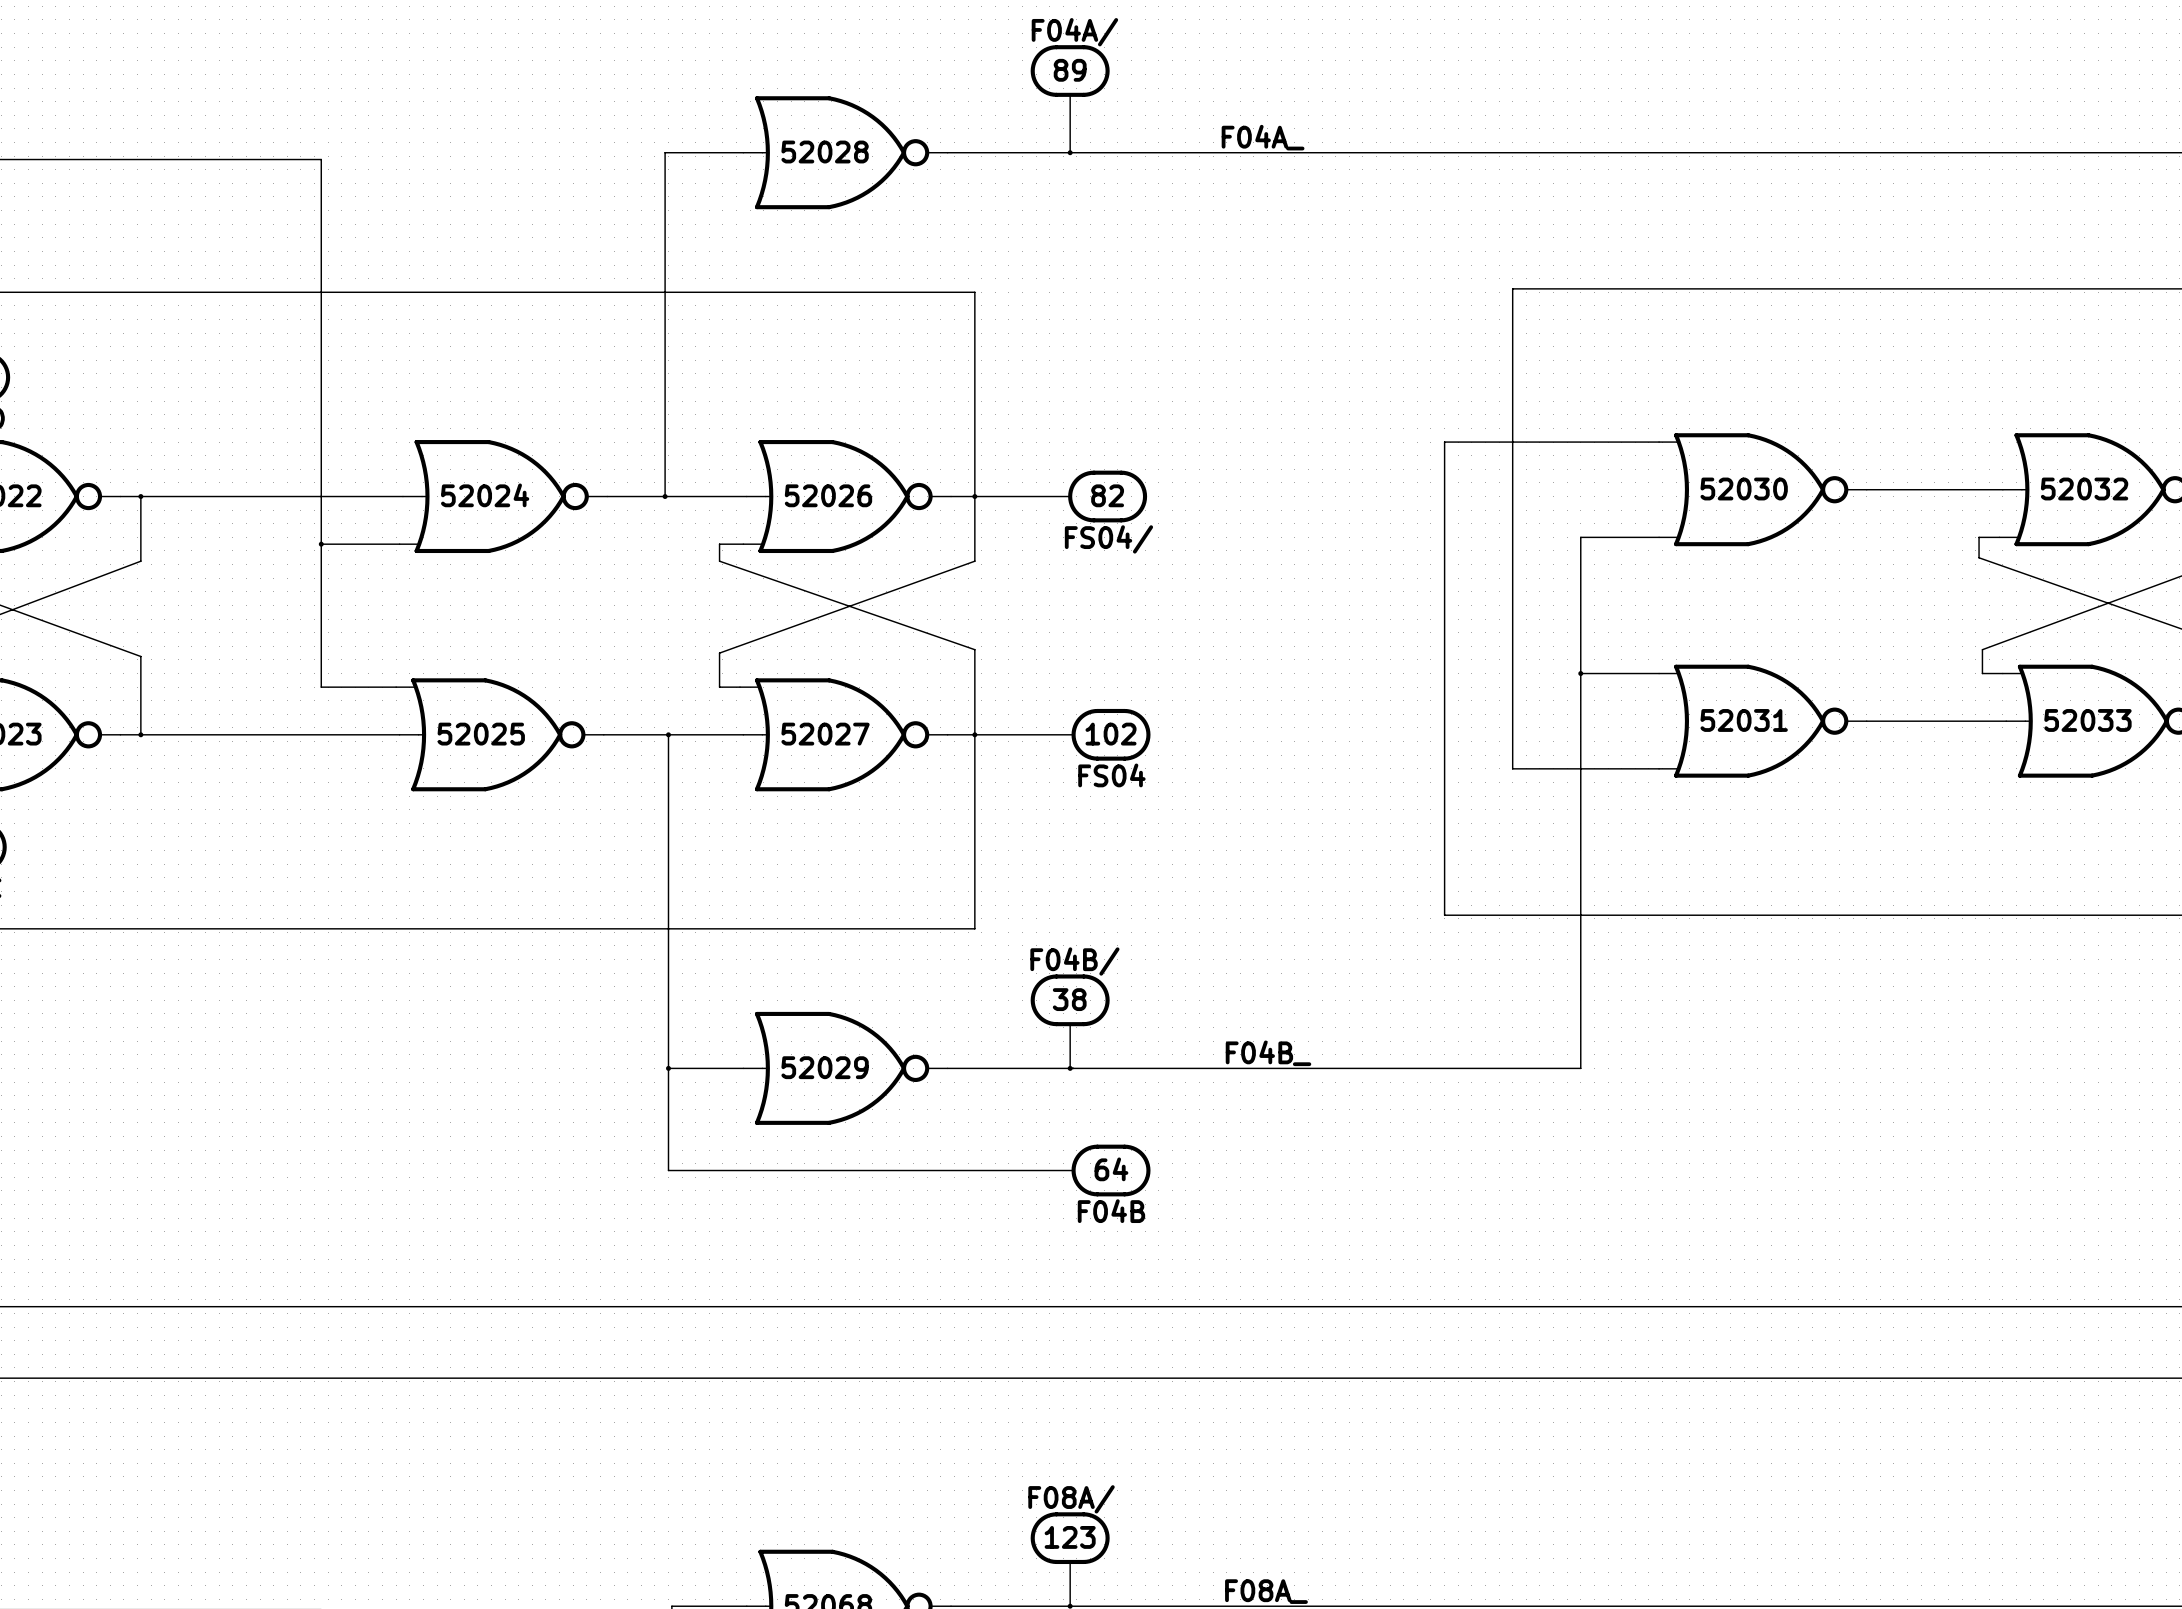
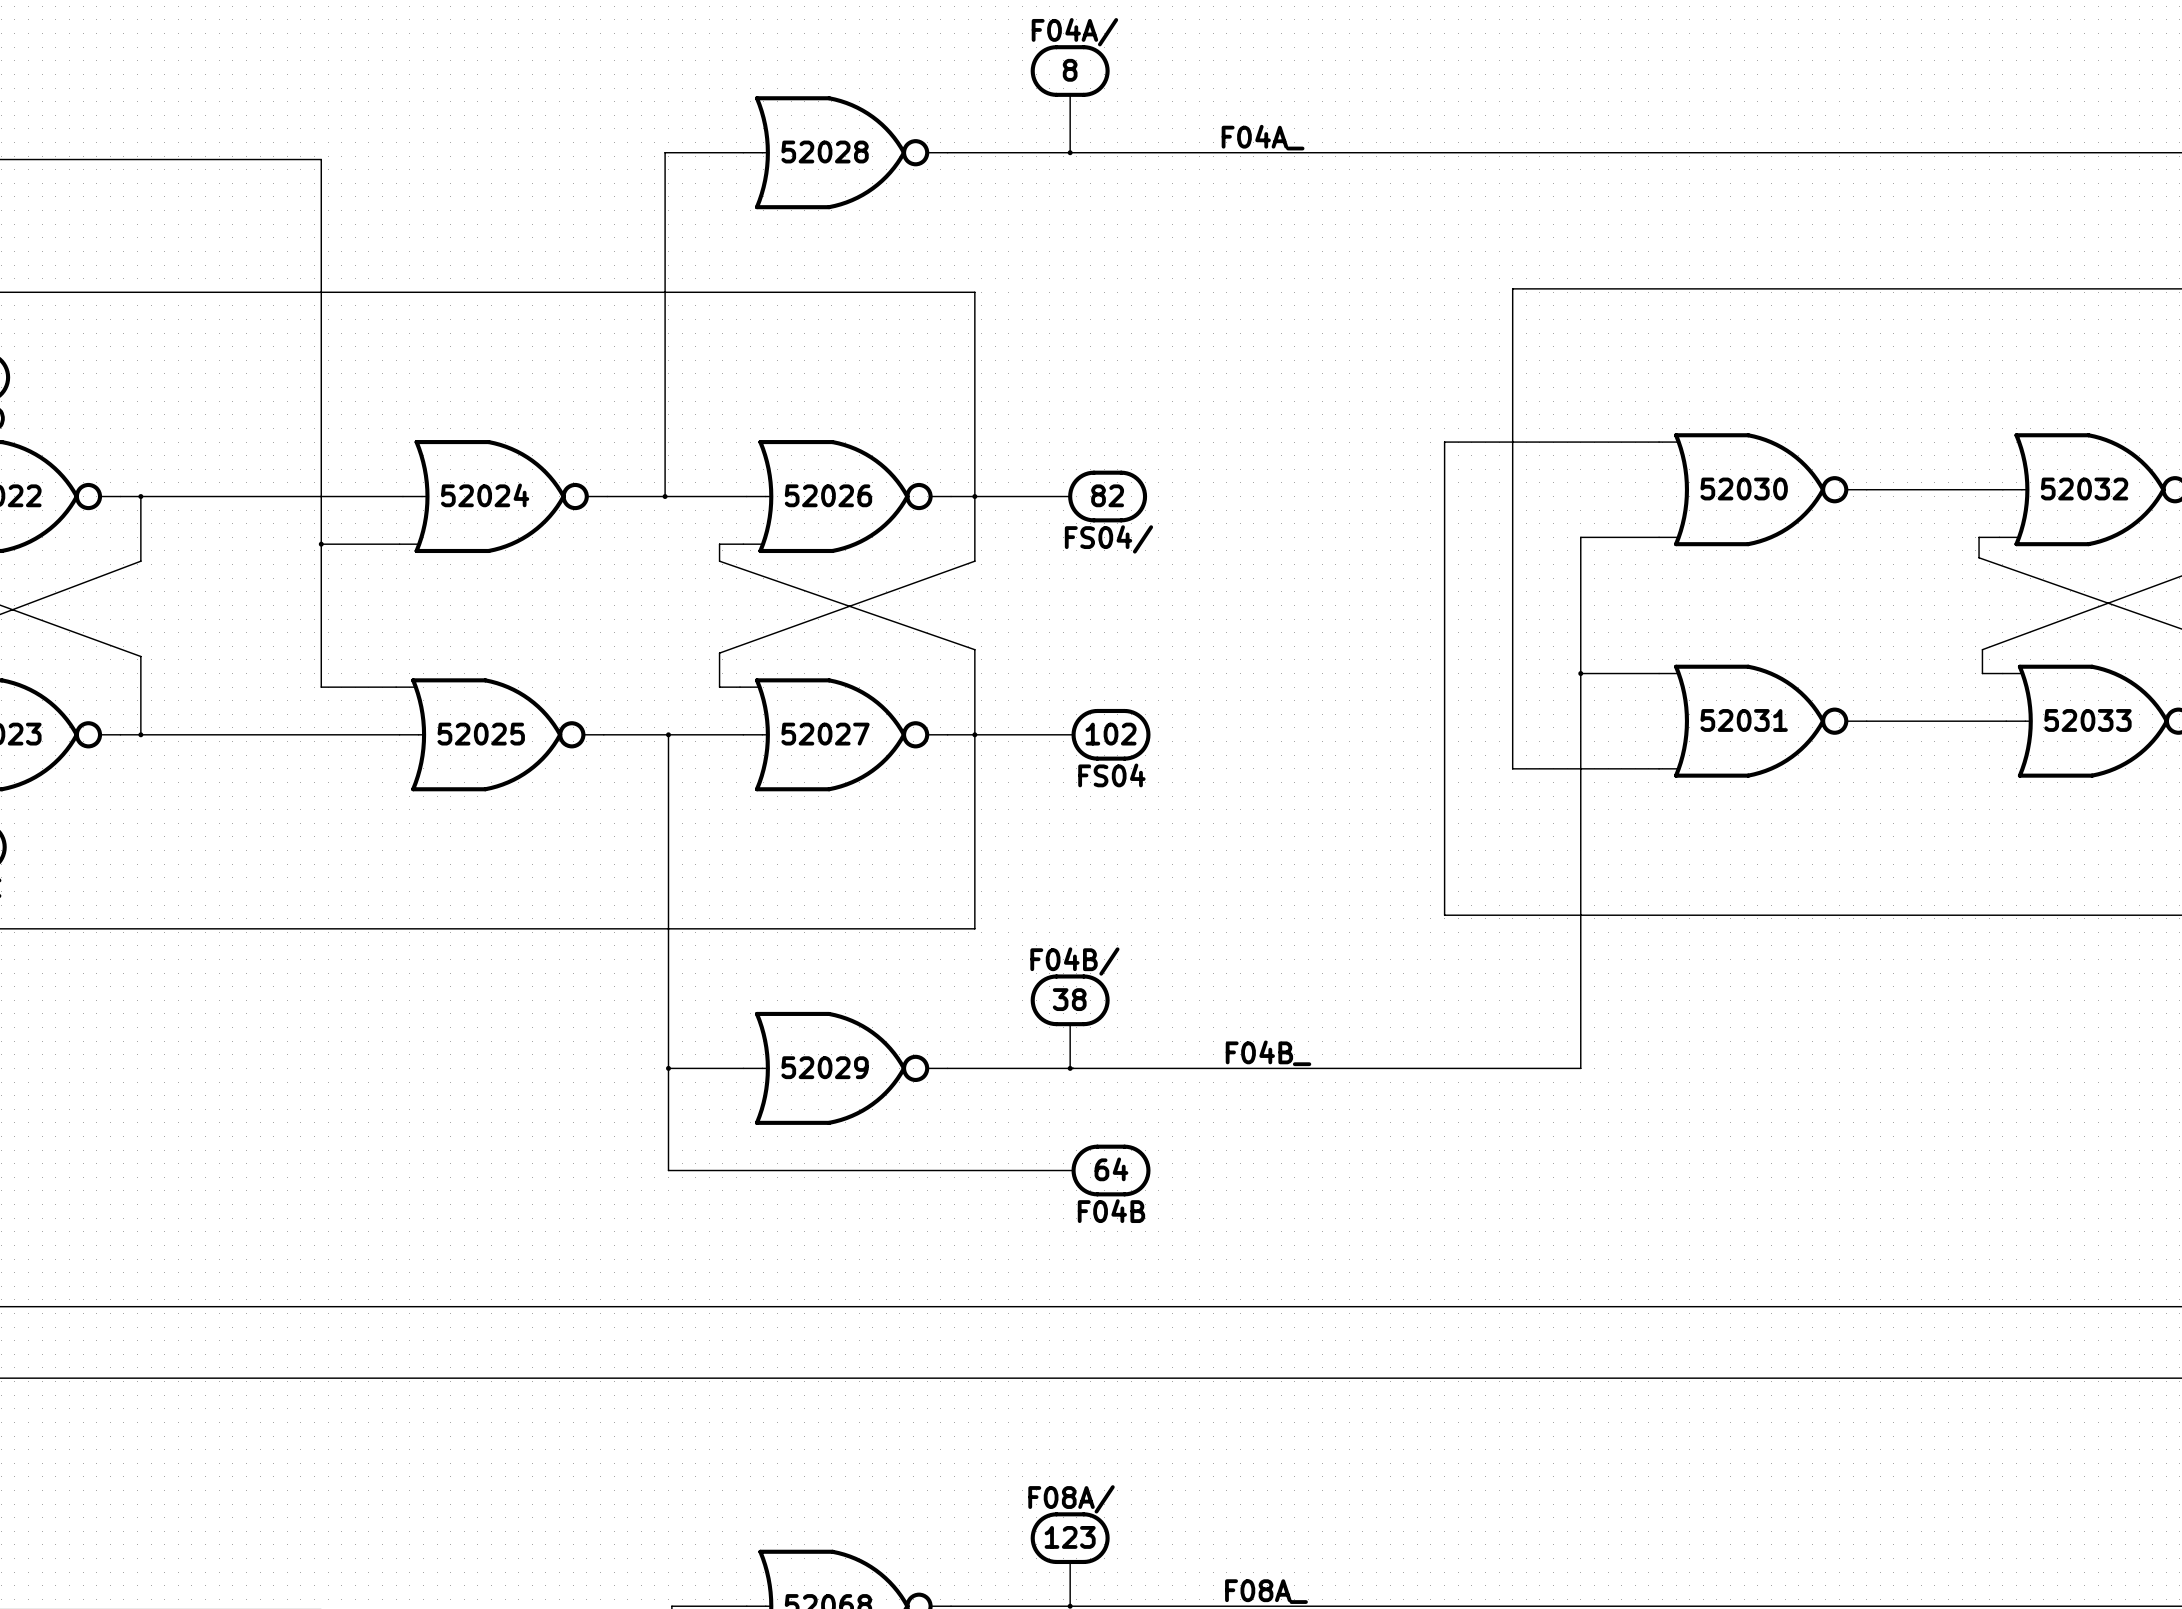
part text: 89 (1070, 70) -> 8 (1070, 70)

